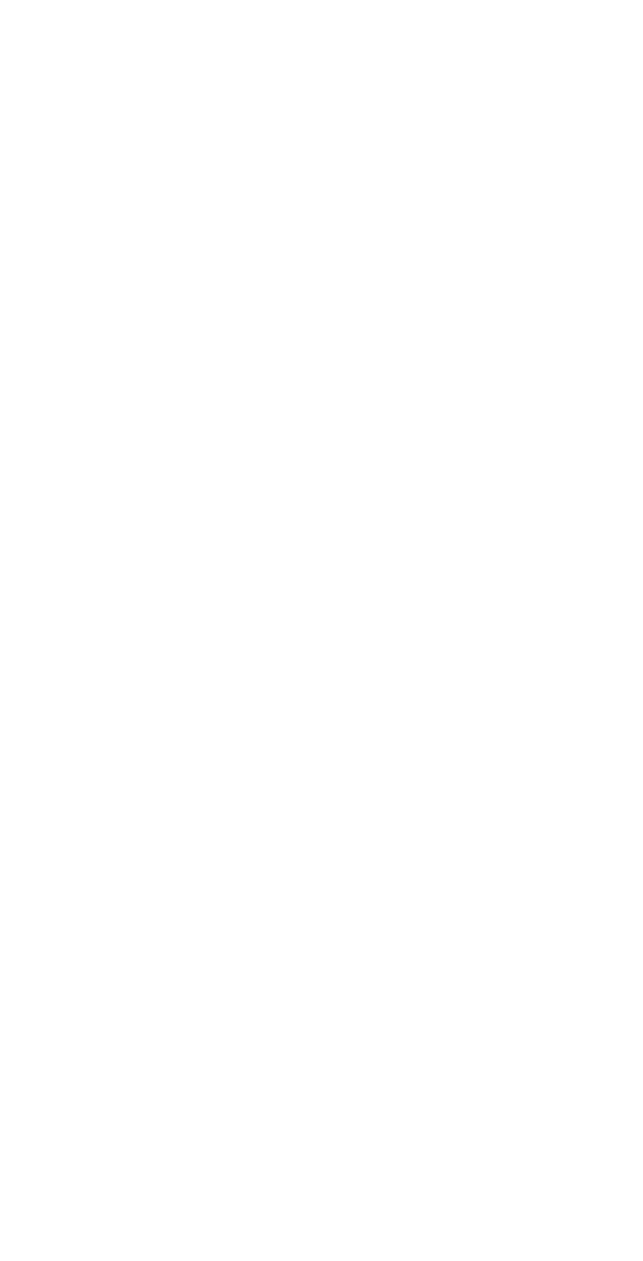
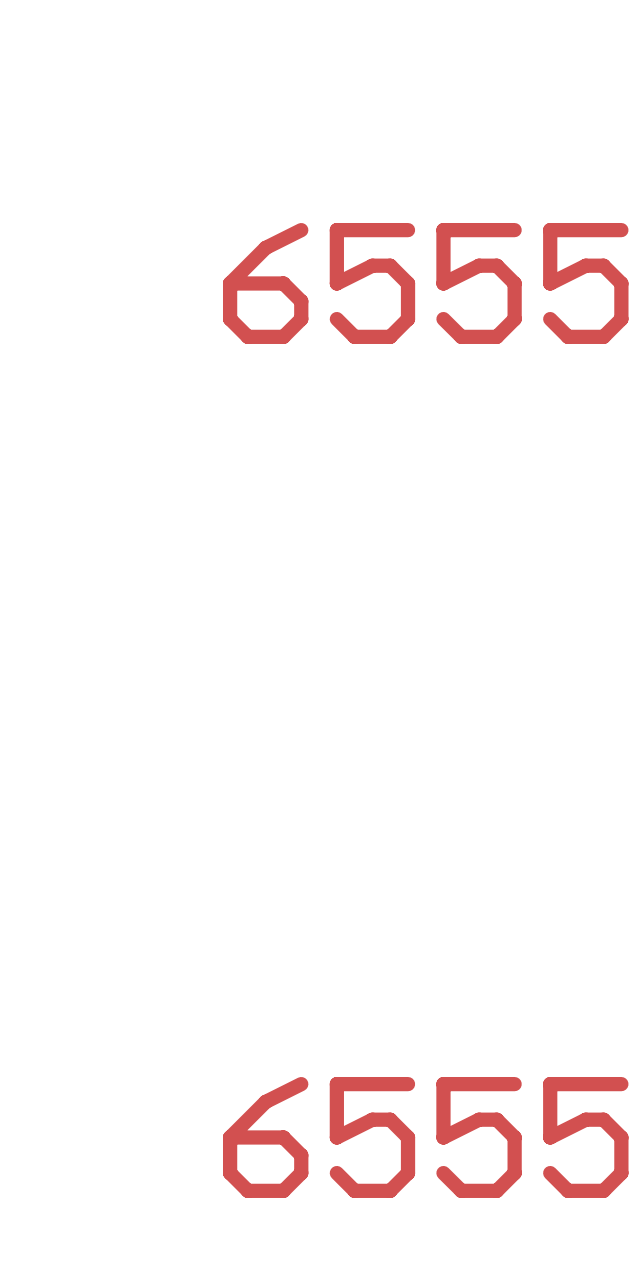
track: none -> (301, 230) (265, 247) (230, 283)
track: none -> (408, 230) (336, 230) (336, 283) (372, 265) (390, 265) (408, 283) (408, 319) (390, 336) (354, 336) (336, 319)
track: none -> (514, 230) (443, 230) (443, 283) (479, 265) (496, 265) (514, 283) (514, 319) (496, 336) (461, 336) (443, 319)
track: none -> (621, 230) (550, 230) (550, 283) (585, 265) (603, 265) (621, 283) (621, 319) (603, 336) (568, 336) (550, 319)
track: none -> (230, 283) (230, 319) (247, 336) (283, 336) (301, 319) (301, 301) (283, 283) (230, 283)
track: none -> (301, 1084) (265, 1101) (230, 1137)
track: none -> (408, 1084) (336, 1084) (336, 1137) (372, 1119) (390, 1119) (408, 1137) (408, 1173) (390, 1190) (354, 1190) (336, 1173)
track: none -> (514, 1084) (443, 1084) (443, 1137) (479, 1119) (496, 1119) (514, 1137) (514, 1173) (496, 1190) (461, 1190) (443, 1173)
track: none -> (621, 1084) (550, 1084) (550, 1137) (585, 1119) (603, 1119) (621, 1137) (621, 1173) (603, 1190) (568, 1190) (550, 1173)
track: none -> (230, 1137) (230, 1173) (247, 1190) (283, 1190) (301, 1173) (301, 1155) (283, 1137) (230, 1137)

